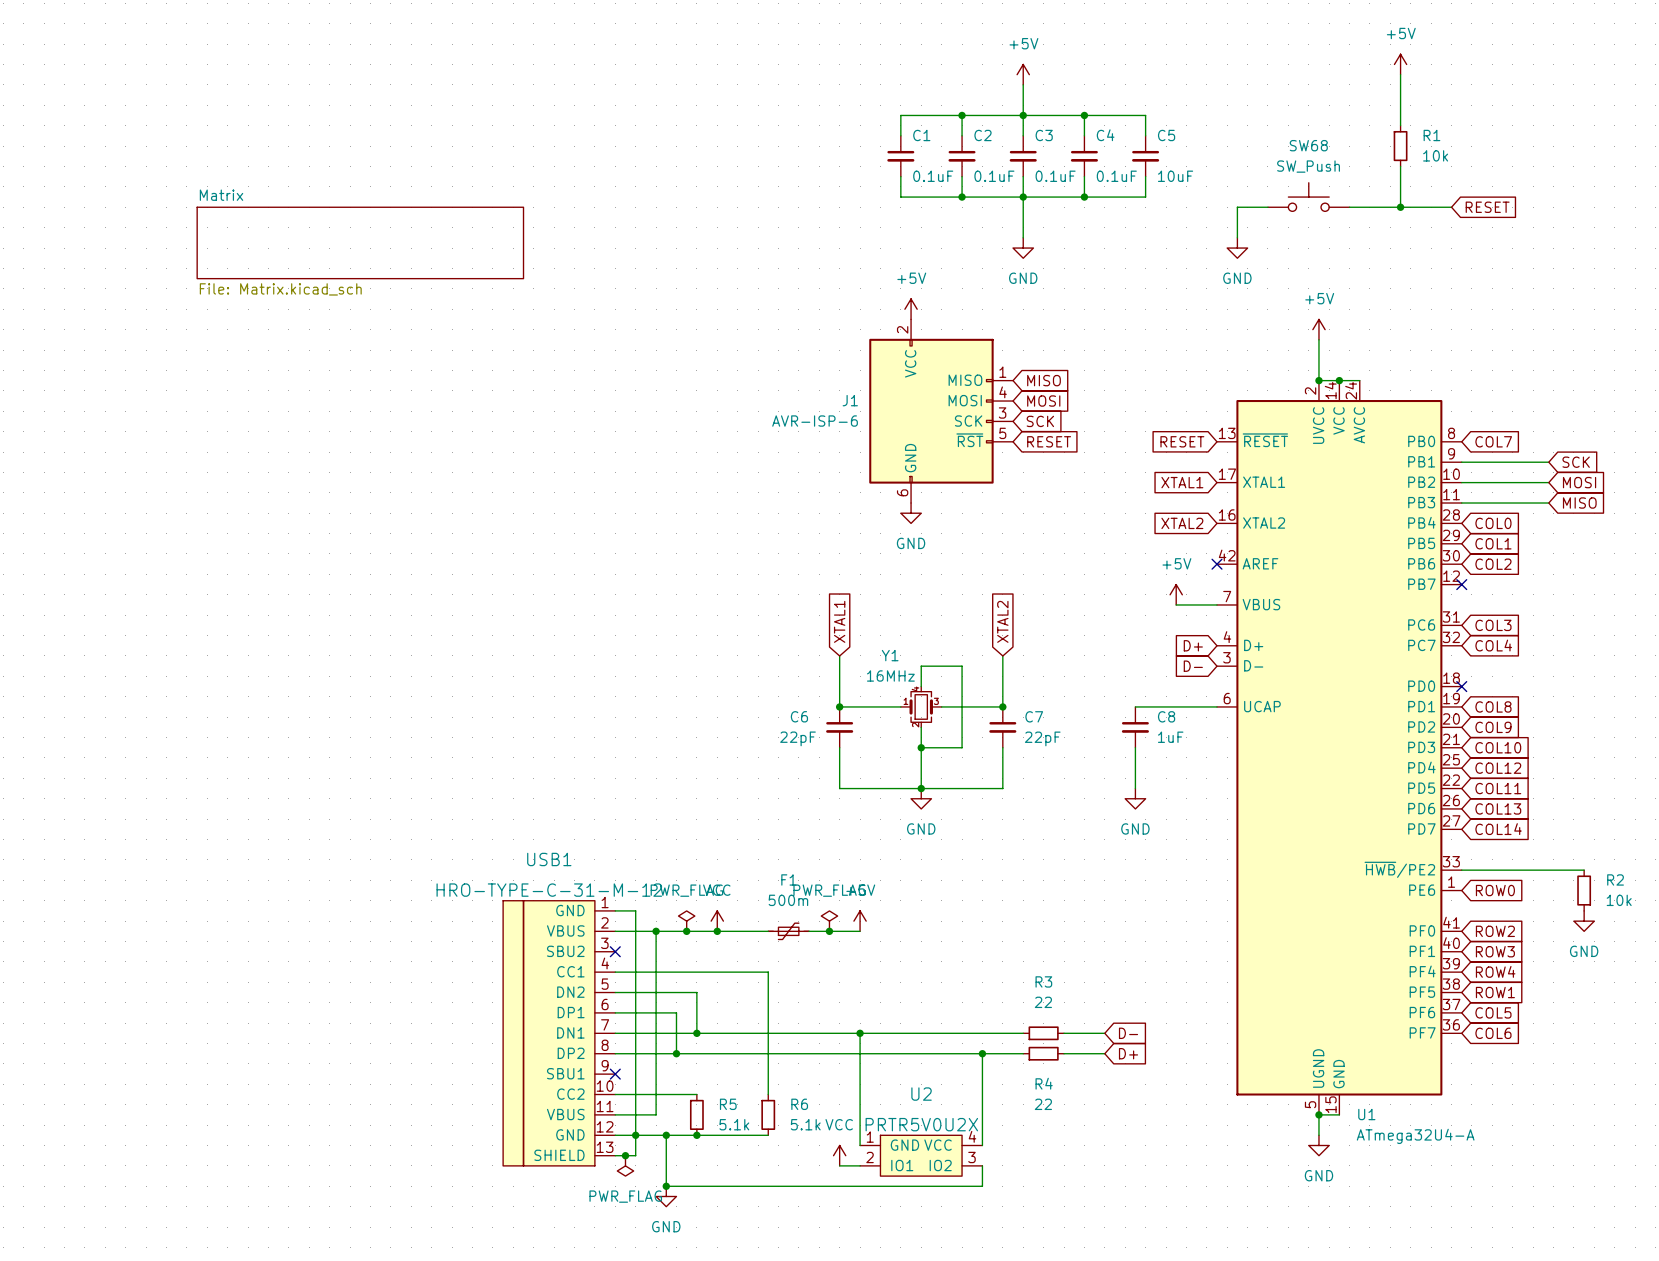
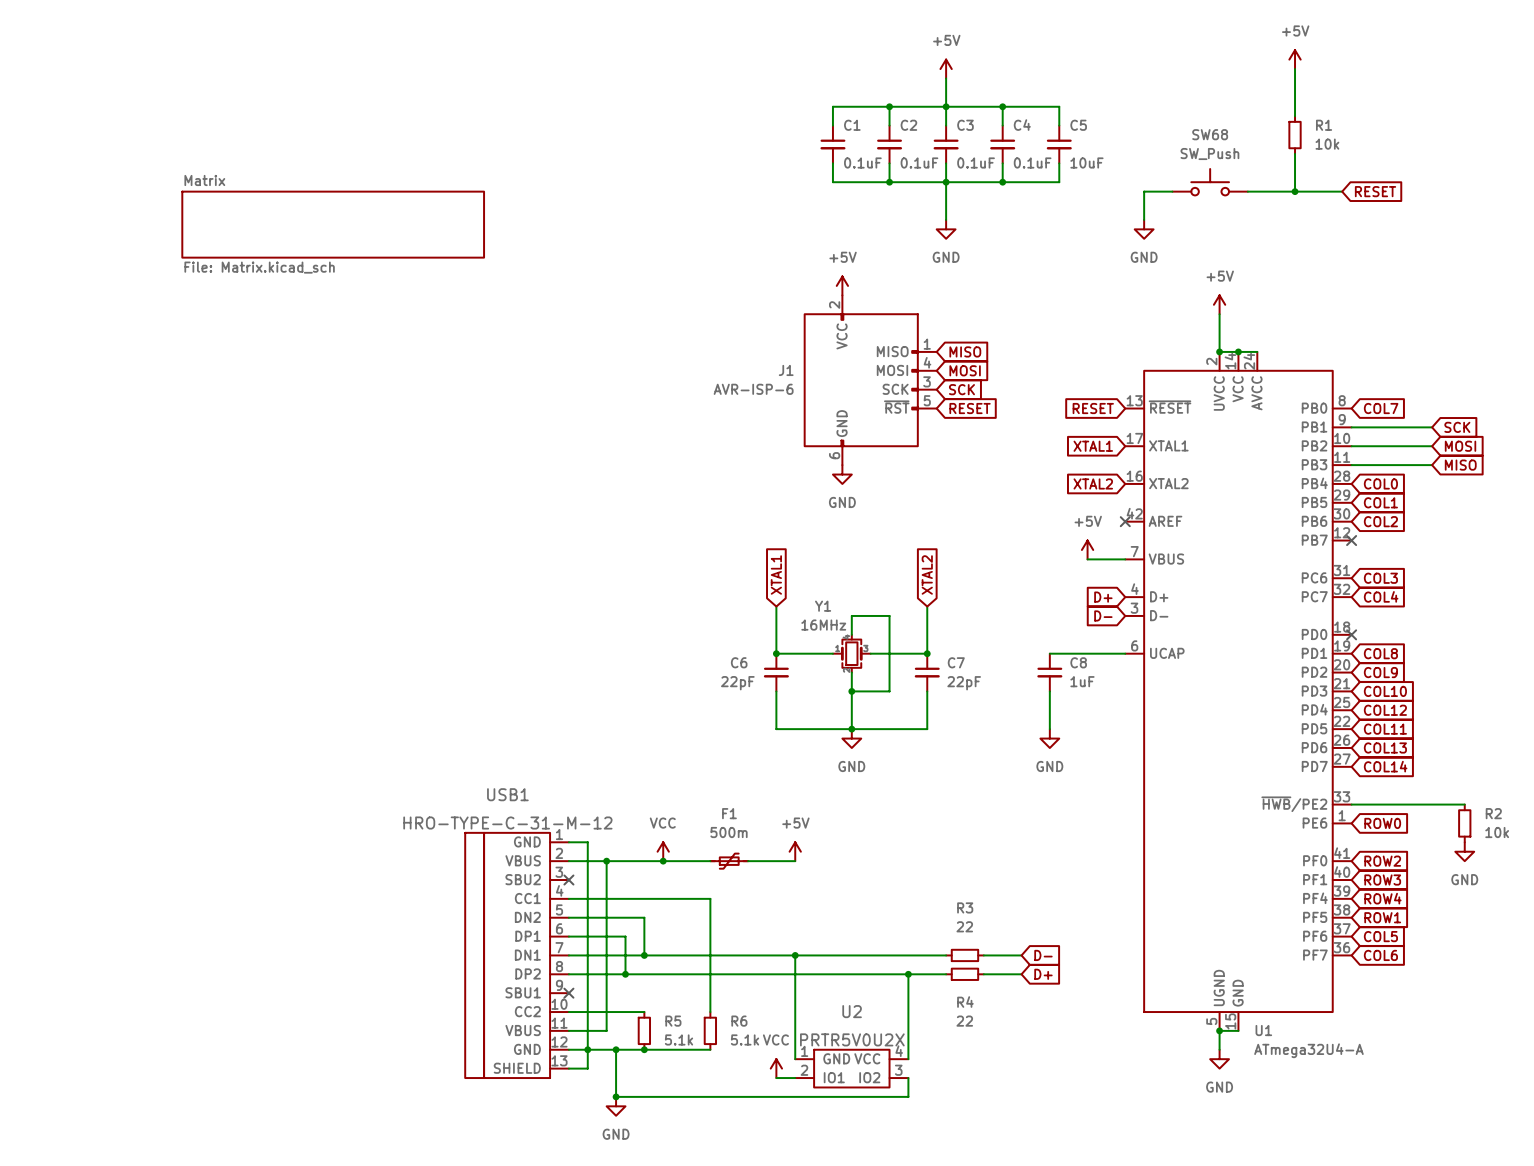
power symbol: PWR_FLAG (686, 921) -> none
power symbol: PWR_FLAG (829, 921) -> none
junction: (686, 931) -> none
junction: (829, 931) -> none
junction: (625, 1155) -> none
power symbol: PWR_FLAG (625, 1165) -> none

